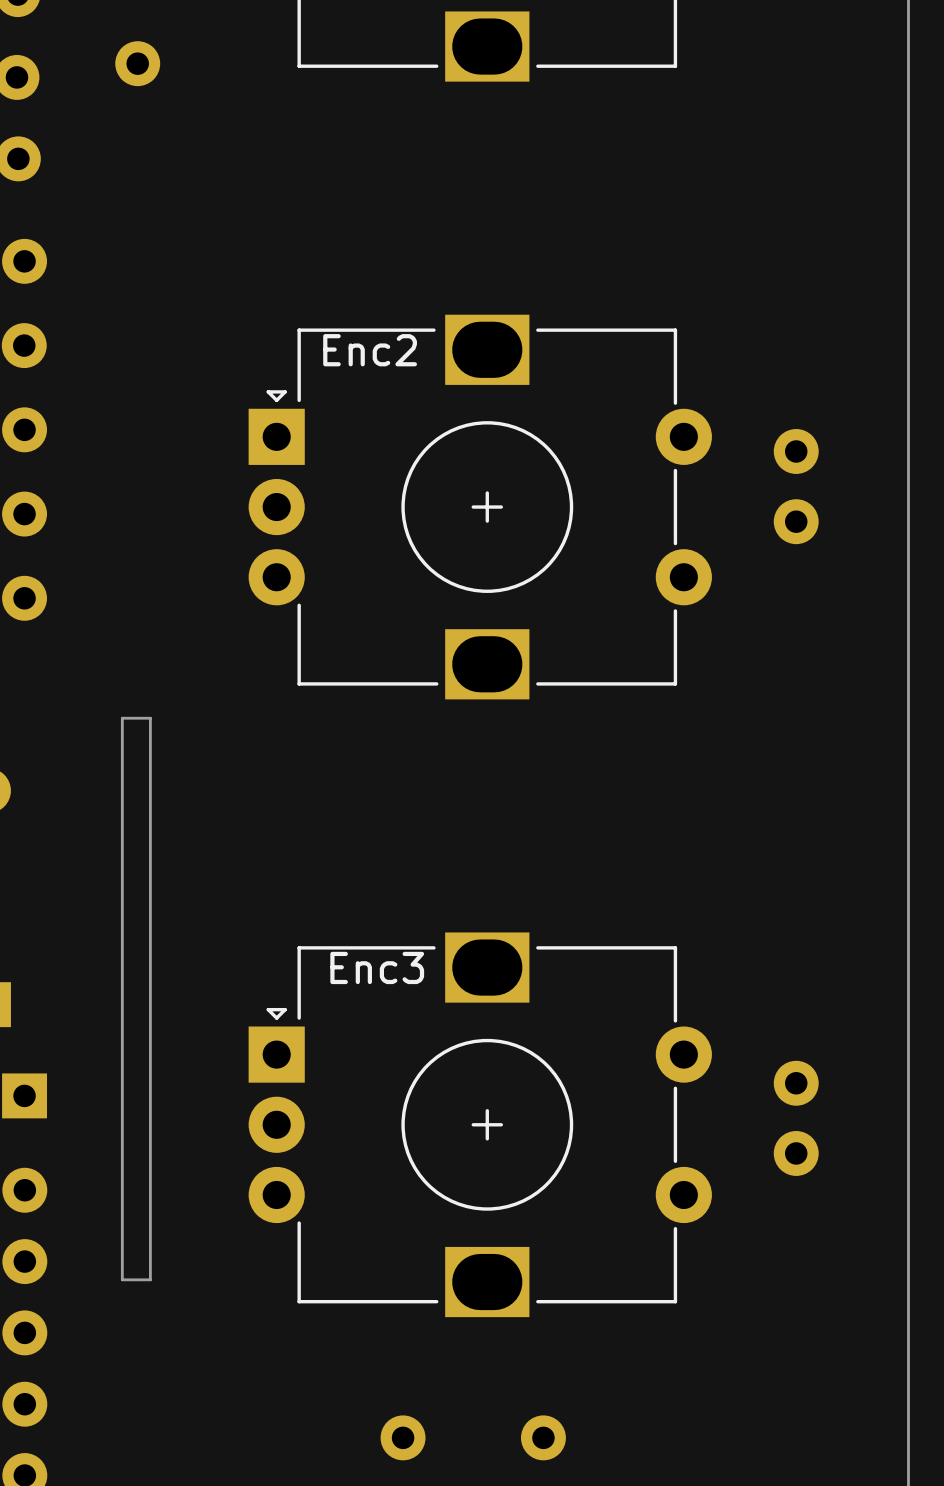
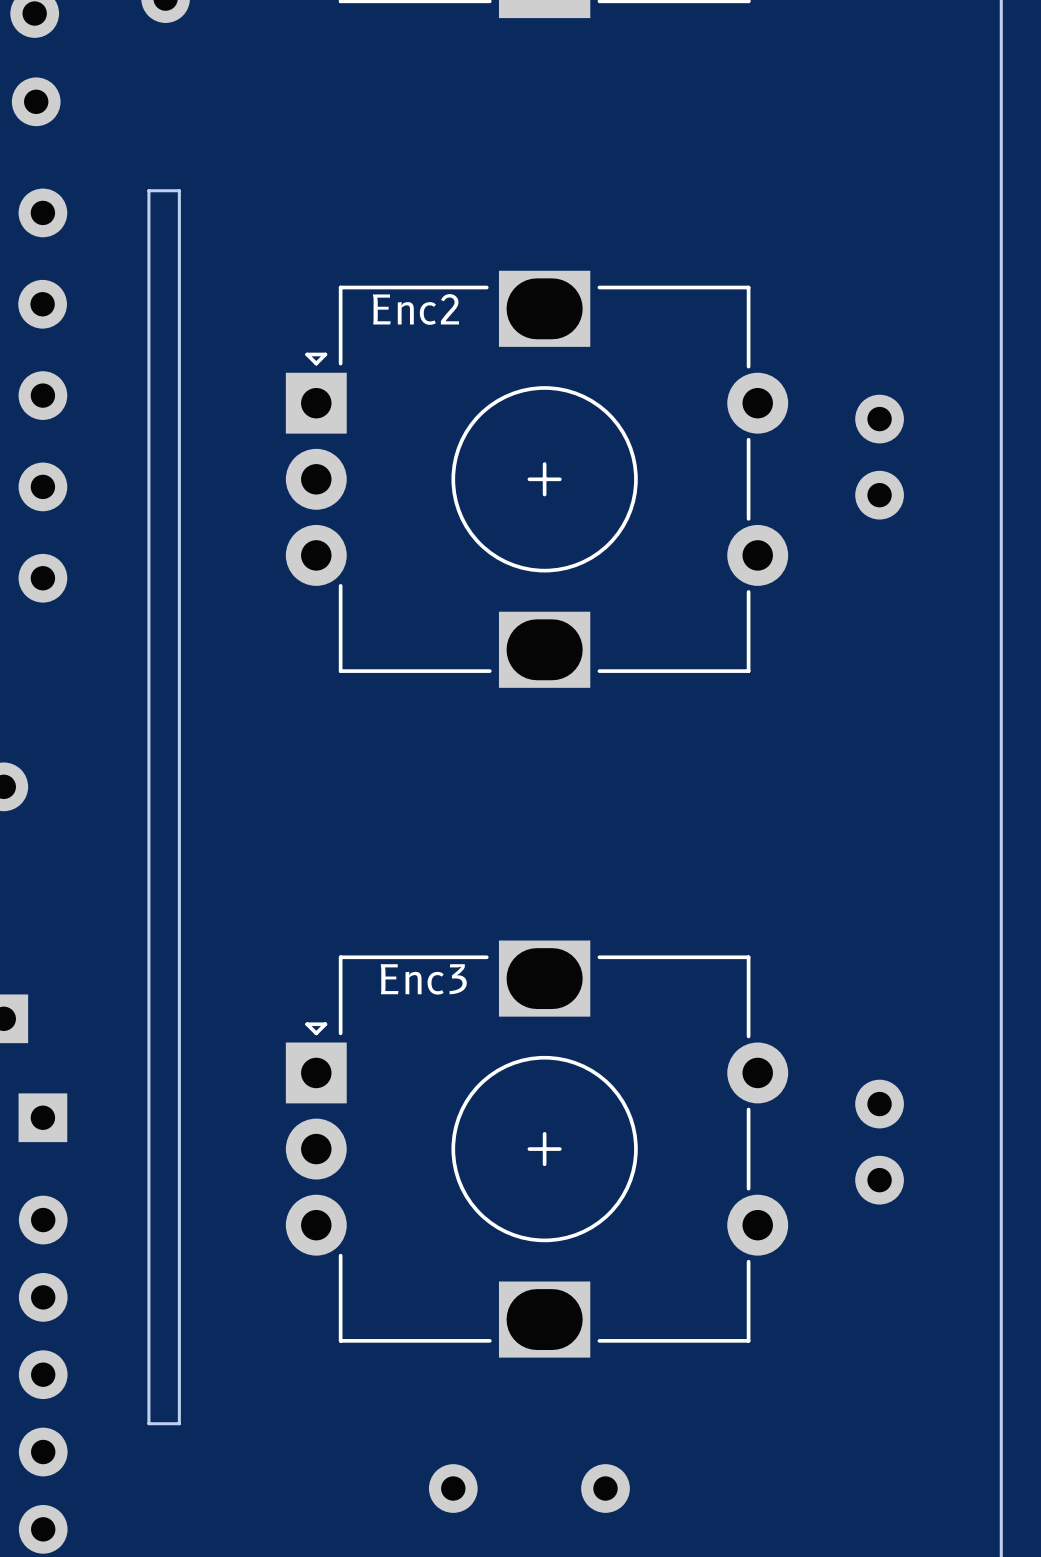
board edge: (150, 718) (122, 718) -> (179, 708) (179, 190) (148, 190) (148, 708)
board edge: (150, 1279) (122, 1279) -> (179, 1317) (179, 1423) (148, 1423) (148, 1317)

